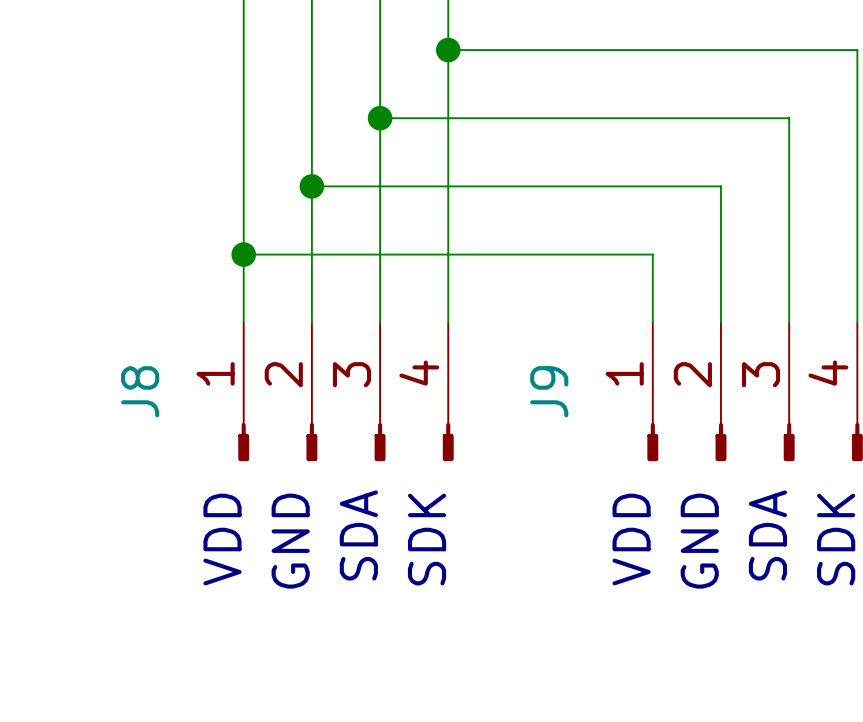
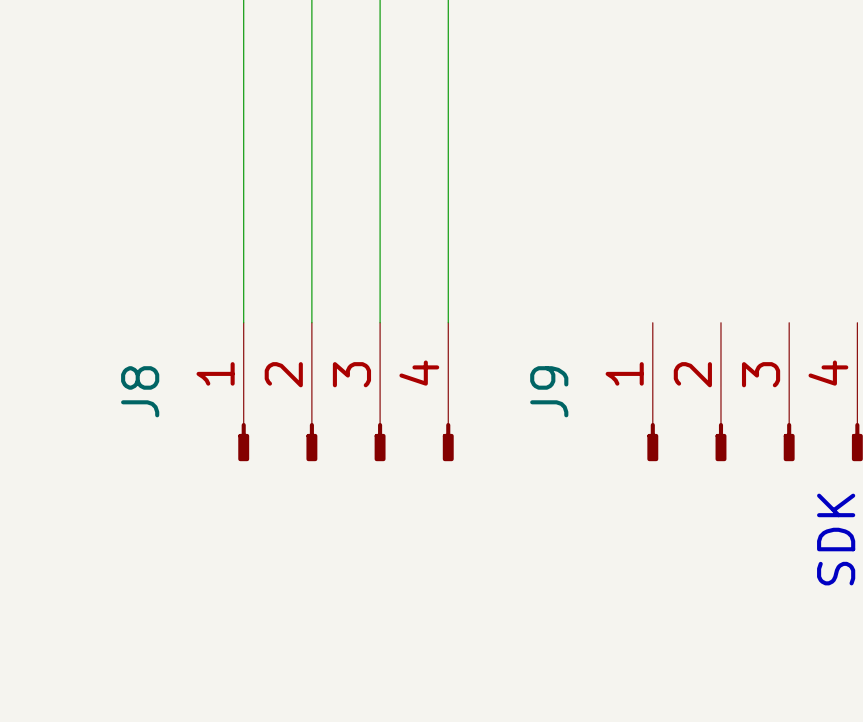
wire: (448, 50) (857, 50) (857, 322) -> none
junction: (448, 50) -> none
wire: (380, 118) (789, 118) (789, 322) -> none
junction: (380, 118) -> none
wire: (311, 186) (720, 186) (720, 322) -> none
junction: (311, 186) -> none
wire: (243, 254) (652, 254) (652, 322) -> none
junction: (243, 254) -> none
text: SDA (358, 535) -> none
text: SDA (767, 535) -> none
text: VDD (222, 539) -> none
text: SDK (427, 539) -> none
text: VDD (631, 539) -> none
text: GND (290, 541) -> none
text: GND (699, 541) -> none

